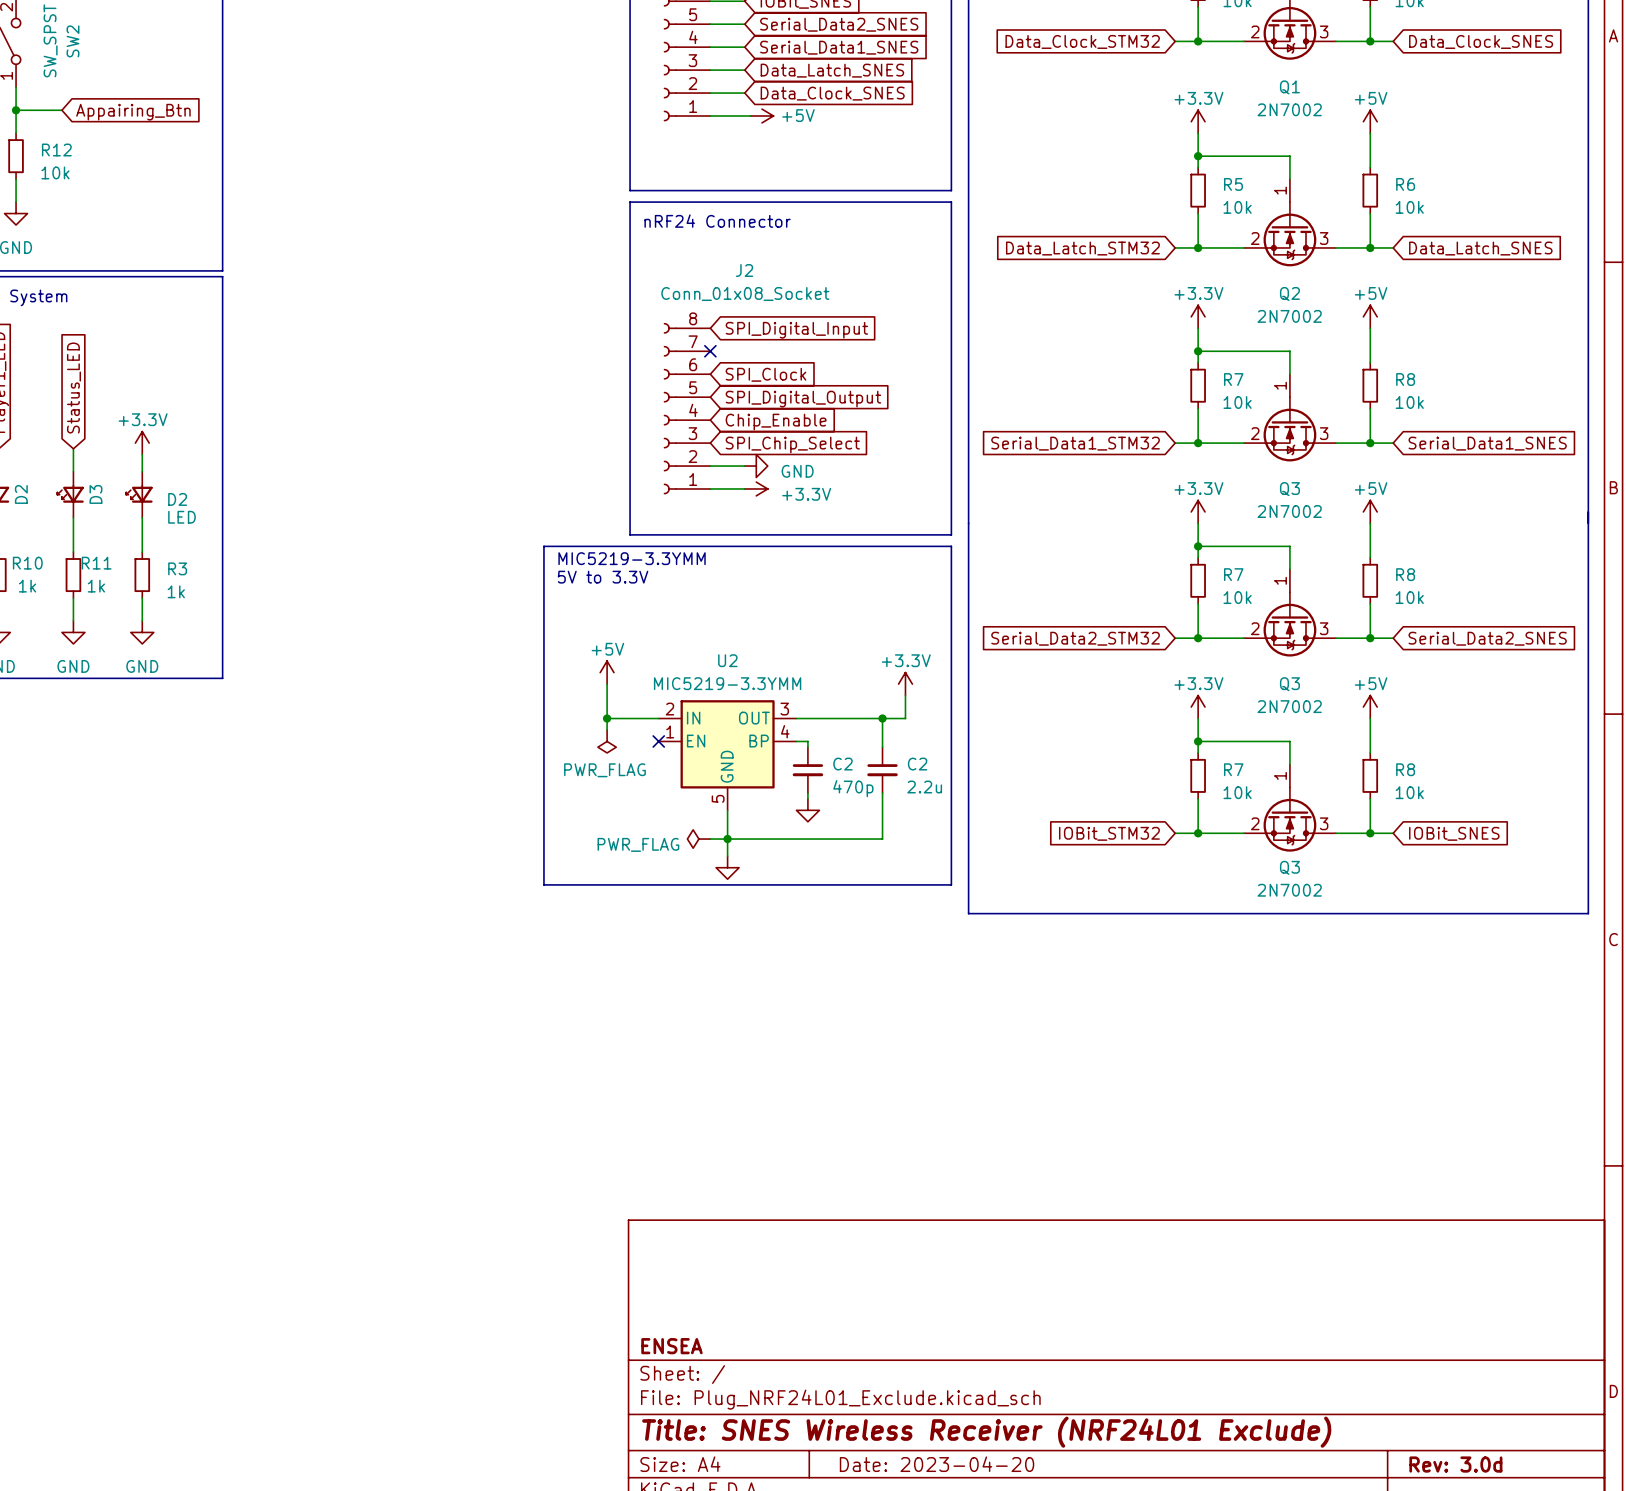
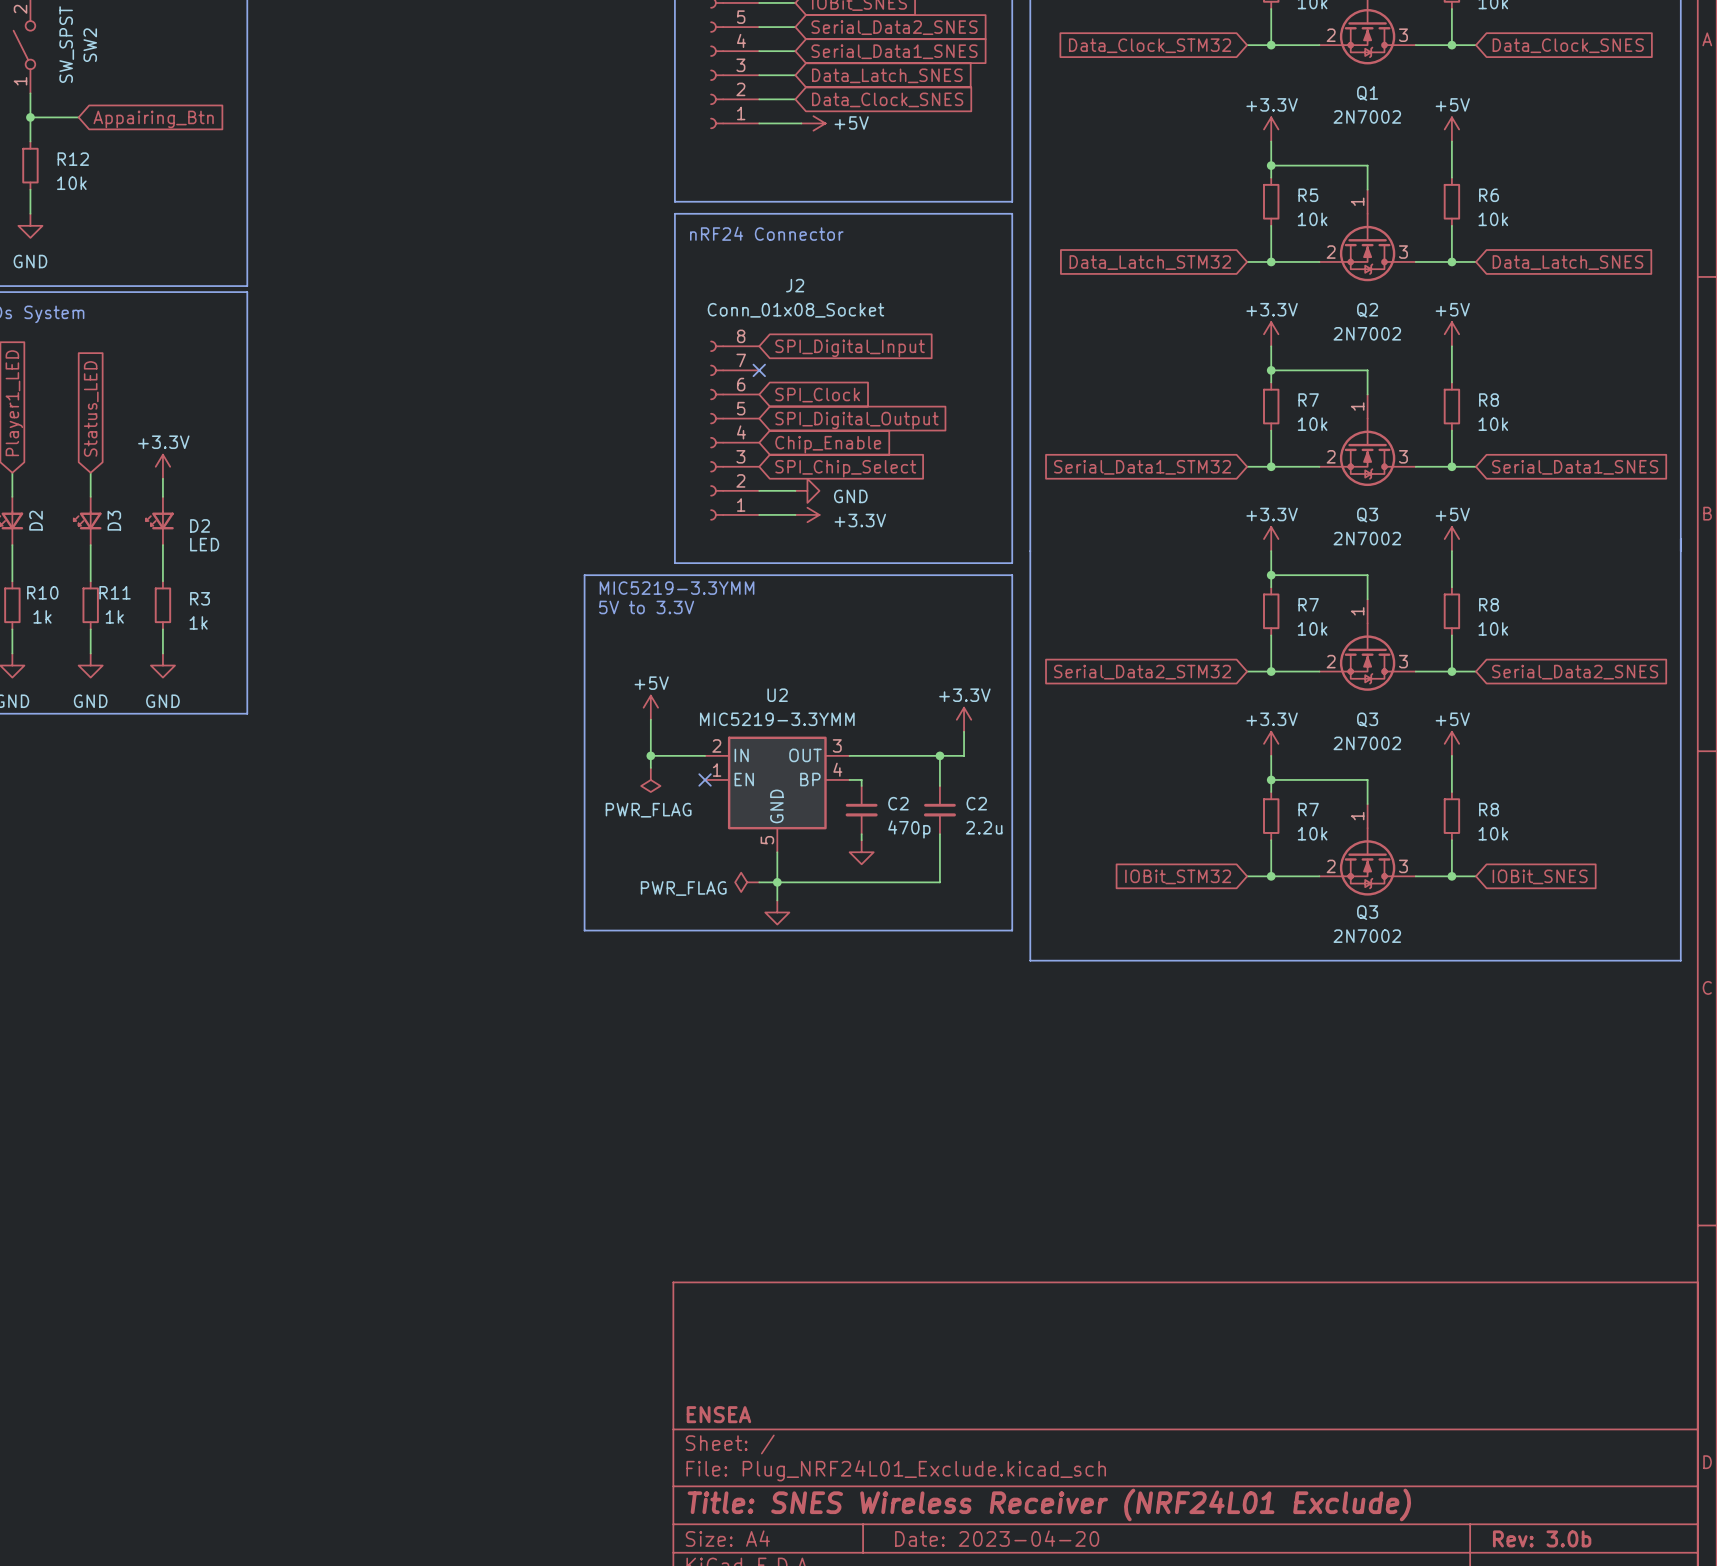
title block: Rev: 3.0d (1455, 1464) -> Rev: 3.0b (1542, 1538)

